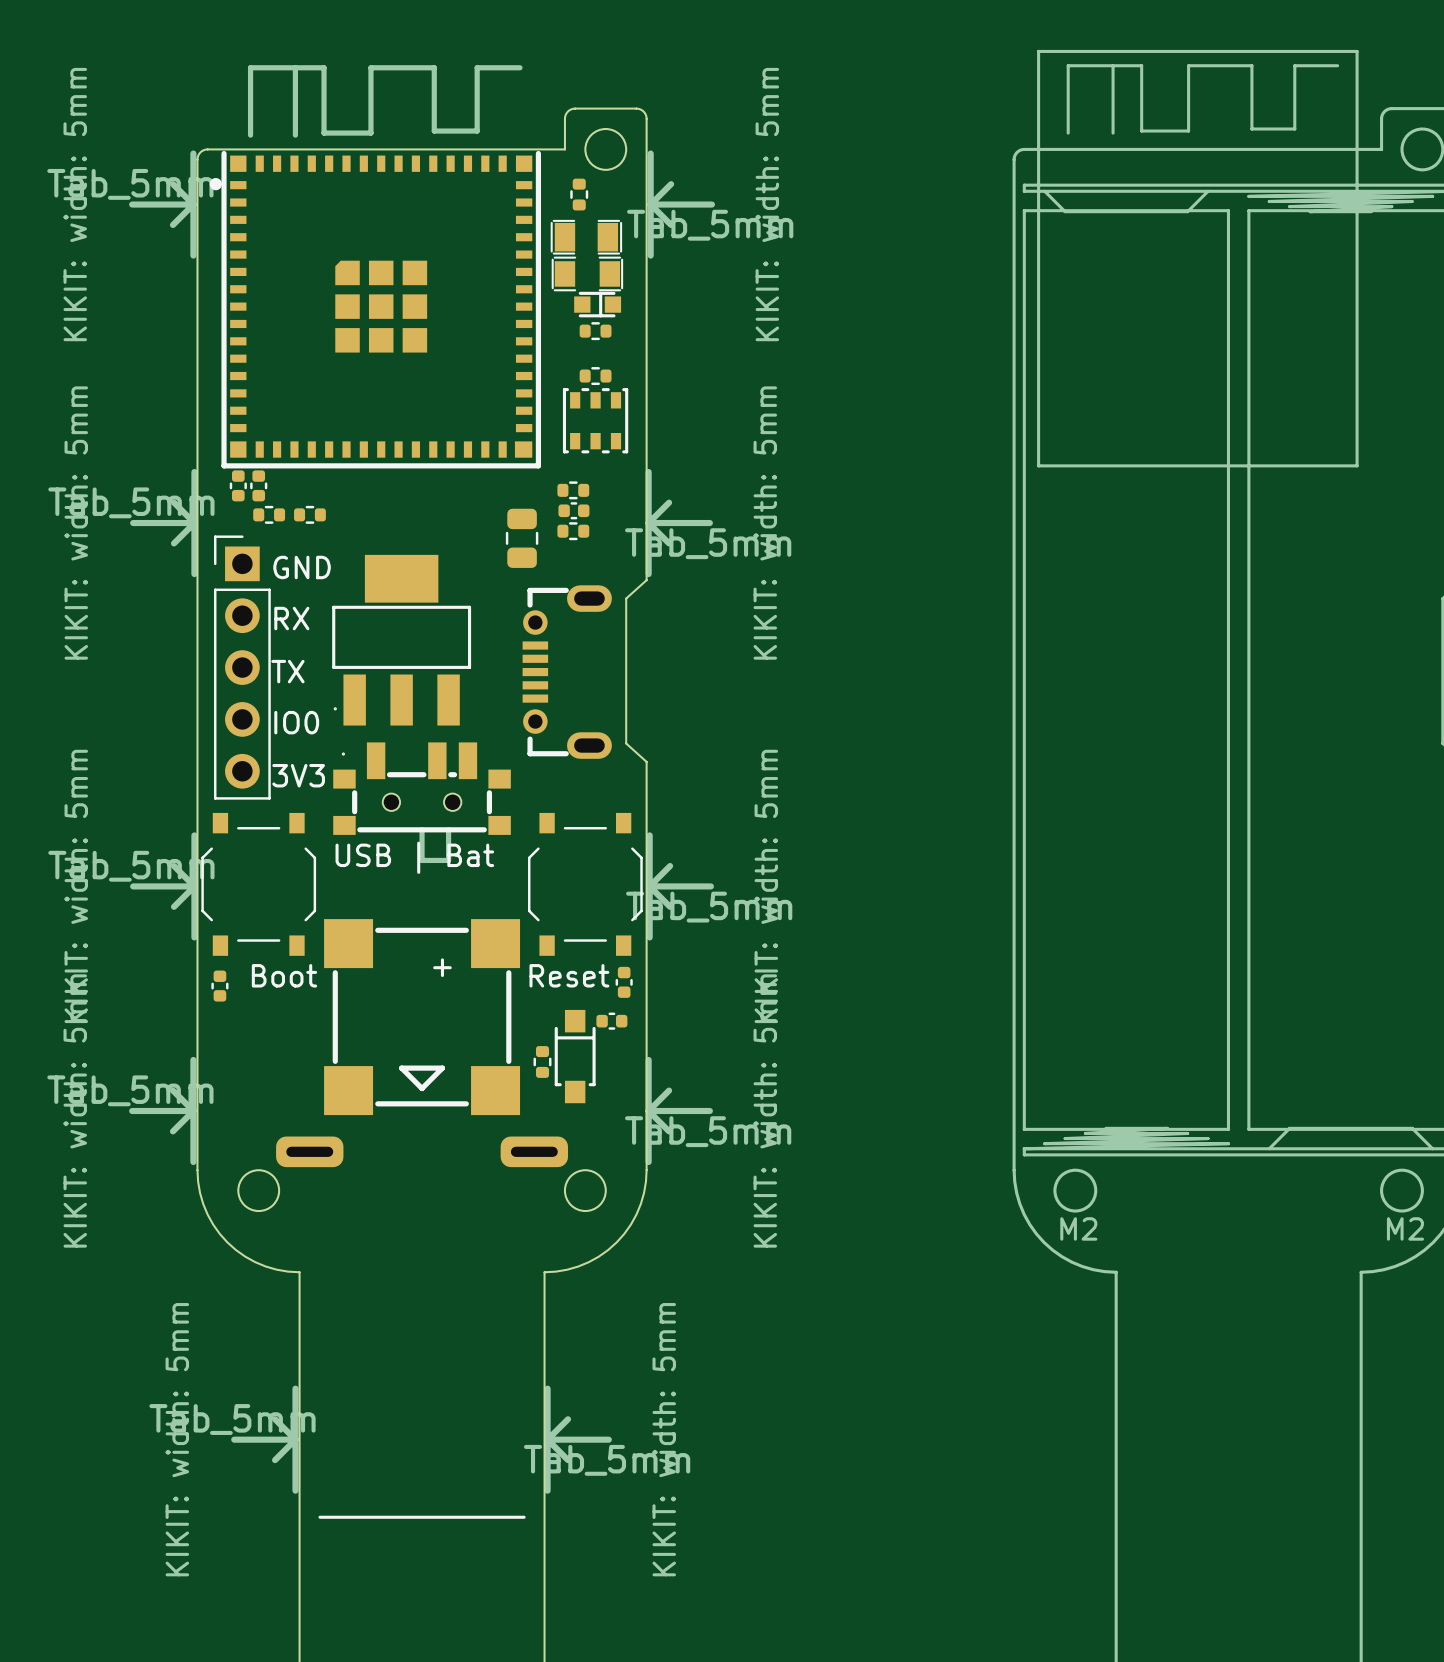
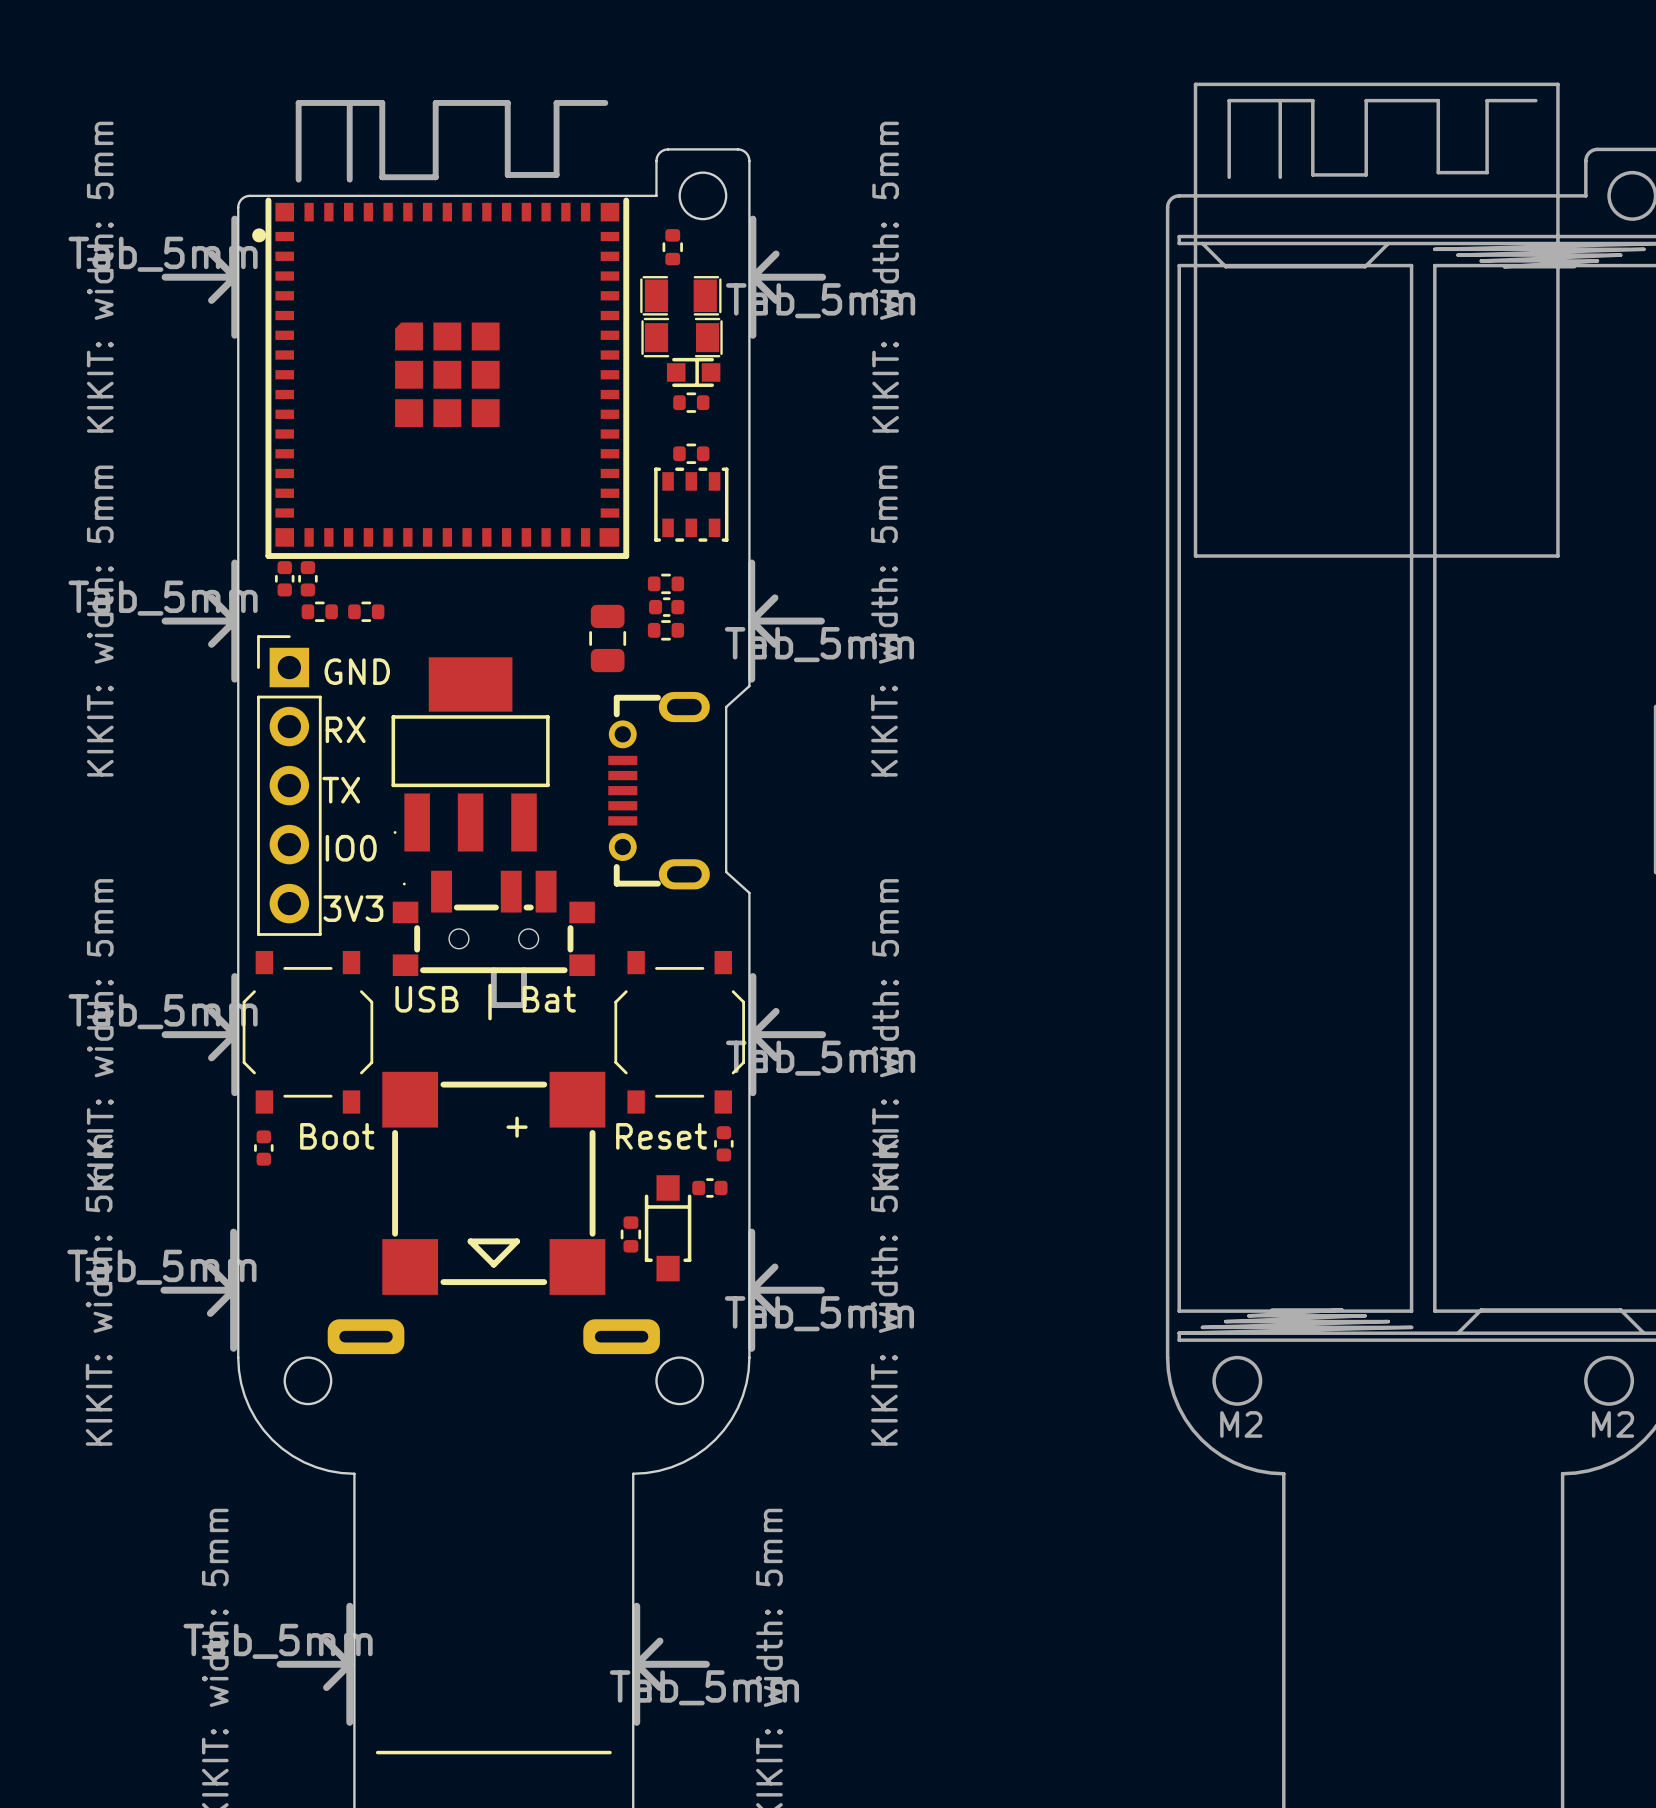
drawing position: (162, 204) -> (199, 277)
drawing position: (681, 204) -> (787, 277)

